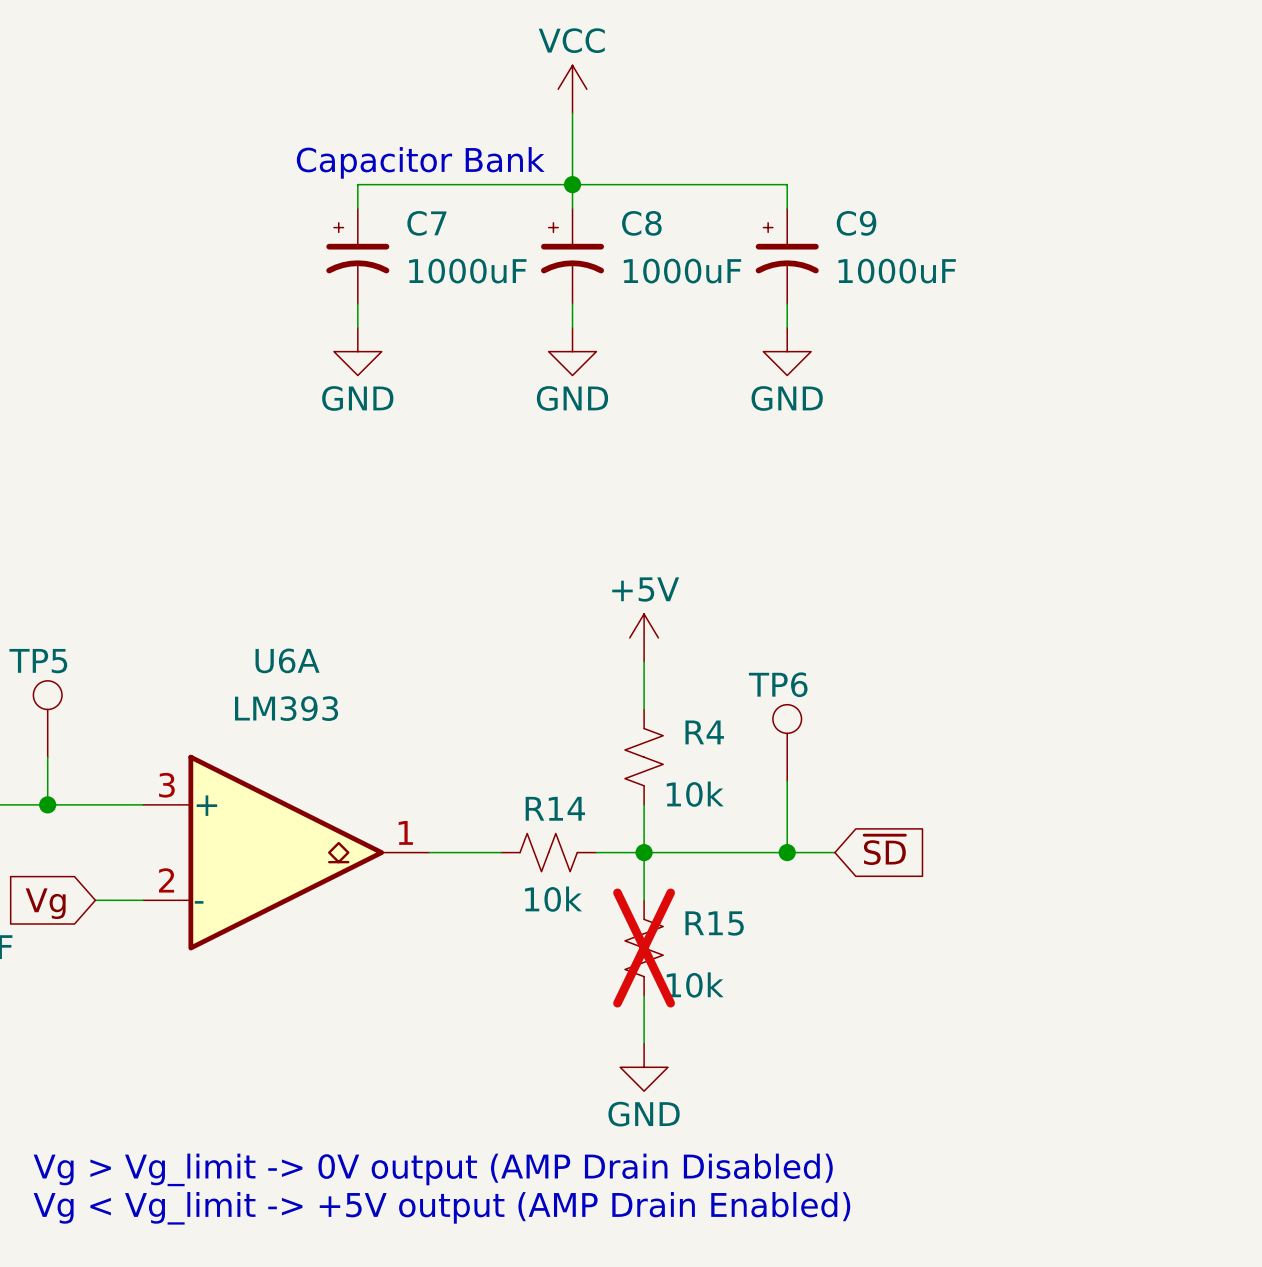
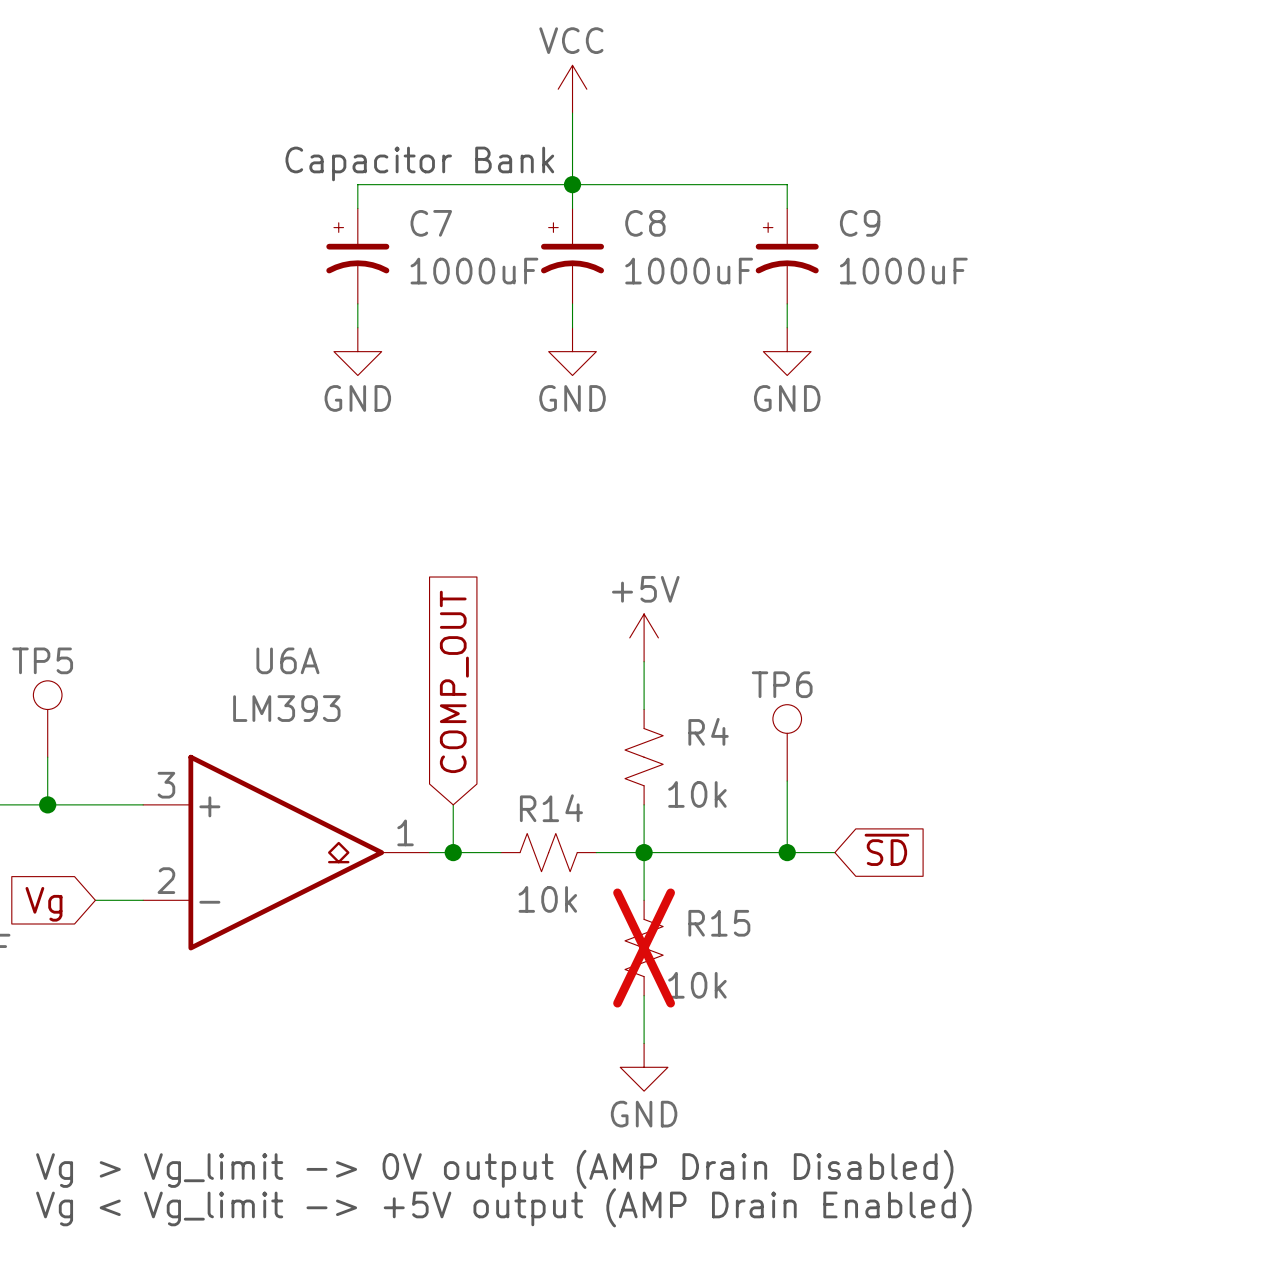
global label: none -> COMP_OUT (454, 681)
wire: none -> (453, 804) (453, 852)
junction: none -> (453, 852)

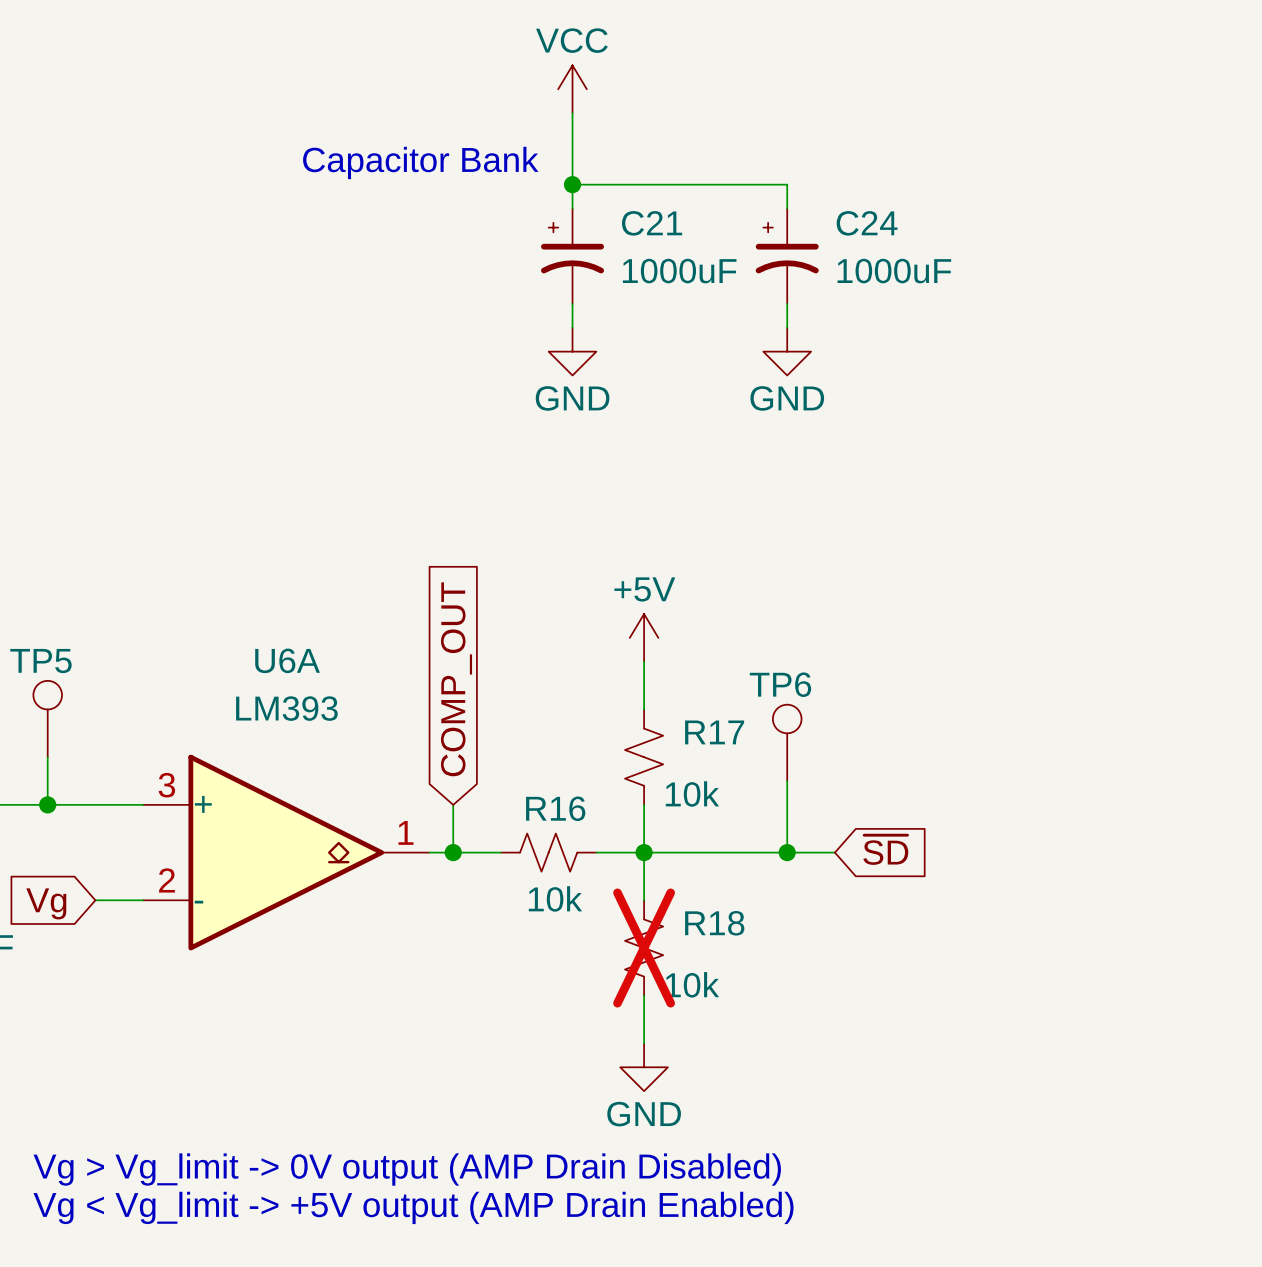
wire: (572, 184) (357, 184) (357, 208) -> none
C8 name: C8 (645, 223) -> C21 (652, 223)
C9 name: C9 (860, 223) -> C24 (867, 223)
C7: 1000uF (357, 256) -> none
wire: (357, 303) (357, 327) -> none
power symbol: GND (357, 351) -> none
R4 name: R4 (708, 731) -> R17 (714, 732)
R14 name: R14 (551, 808) -> R16 (555, 808)
R15 name: R15 (719, 923) -> R18 (714, 923)

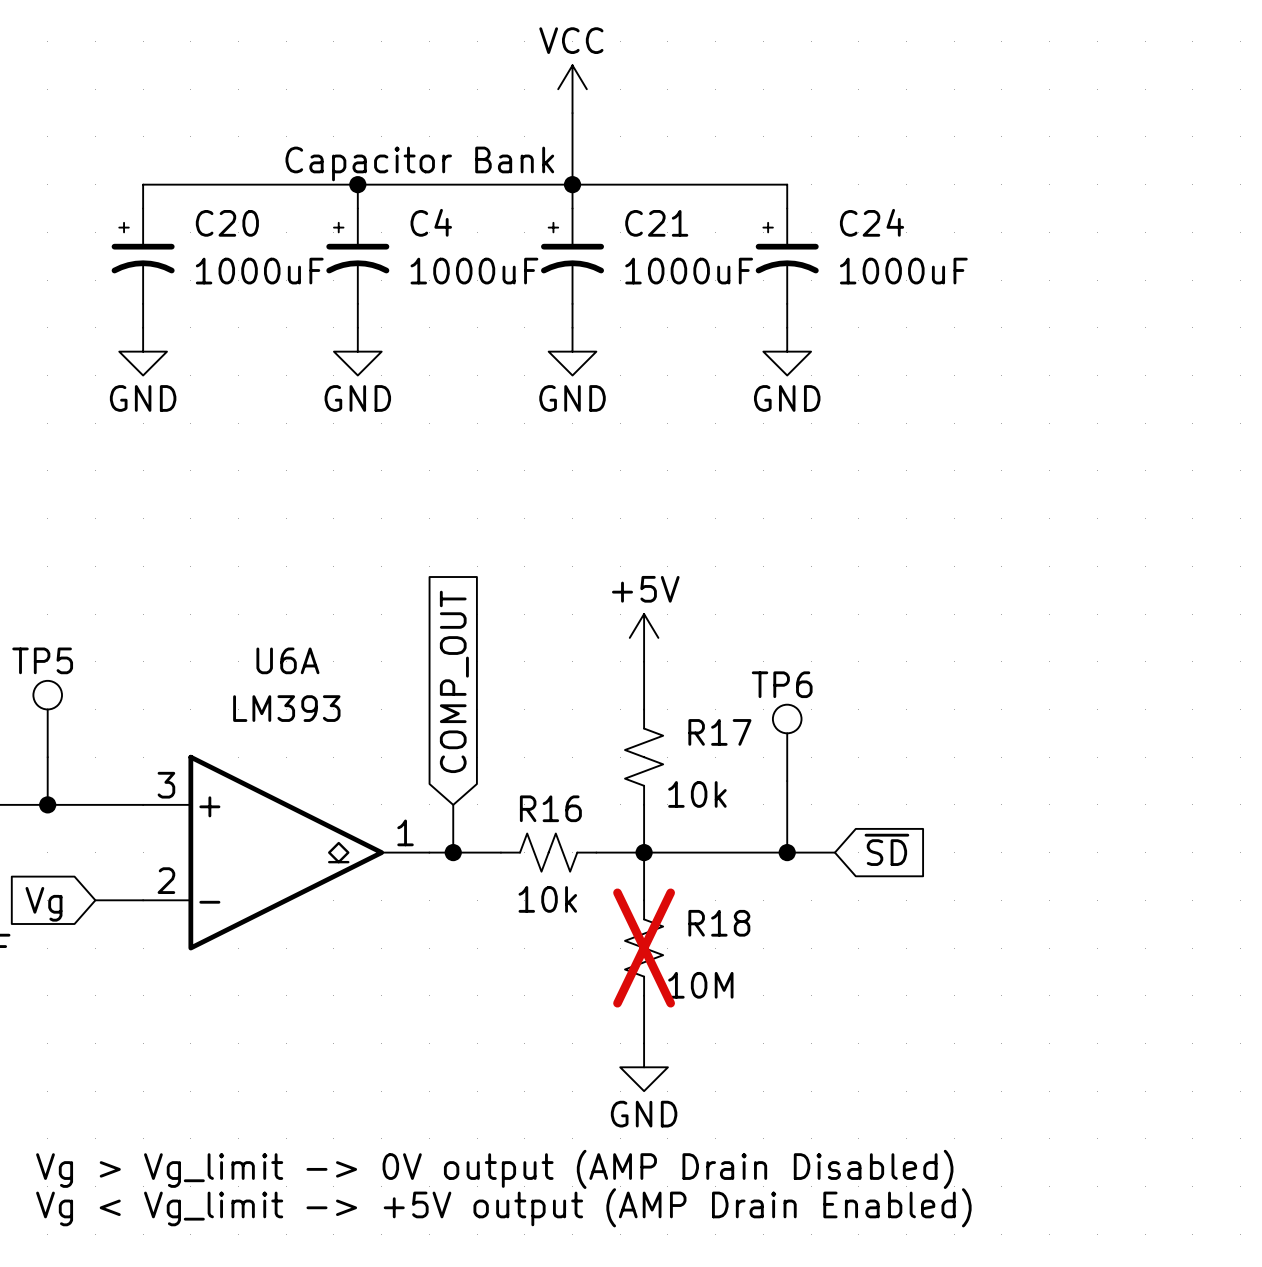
wire: none -> (357, 184) (357, 208)
junction: none -> (357, 184)
wire: none -> (572, 184) (143, 184) (143, 208)
C20: none -> 1000uF (143, 256)
C4: none -> 1000uF (357, 256)
wire: none -> (143, 303) (143, 327)
wire: none -> (357, 303) (357, 327)
power symbol: none -> GND (143, 351)
power symbol: none -> GND (357, 351)
R18 value: 10k (692, 984) -> 10M (700, 985)

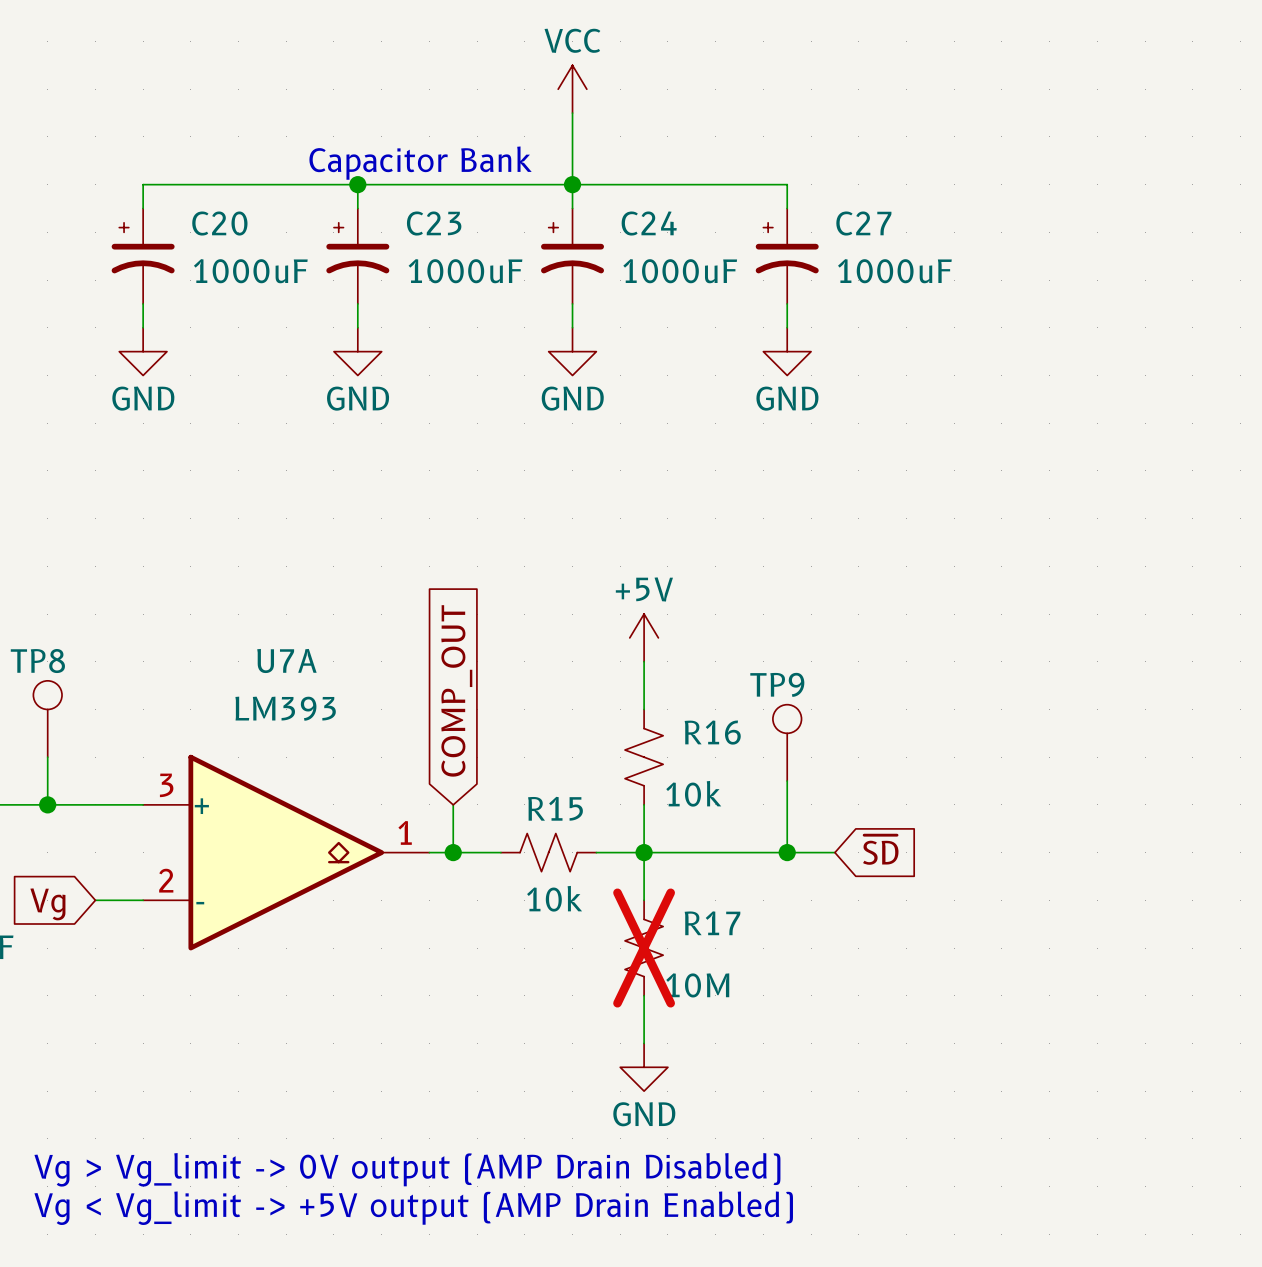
C4 name: C4 (431, 222) -> C23 (434, 223)
C24 name: C24 (872, 222) -> C27 (863, 223)
C21 name: C21 (656, 223) -> C24 (649, 223)
TP5 name: TP5 (42, 660) -> TP8 (37, 661)
U6A name: U6A (287, 660) -> U7A (286, 660)
TP6 name: TP6 (782, 684) -> TP9 (777, 684)
R17 name: R17 (719, 732) -> R16 (712, 732)
R16 name: R16 (550, 808) -> R15 (555, 808)
R18 name: R18 (719, 923) -> R17 (712, 923)

